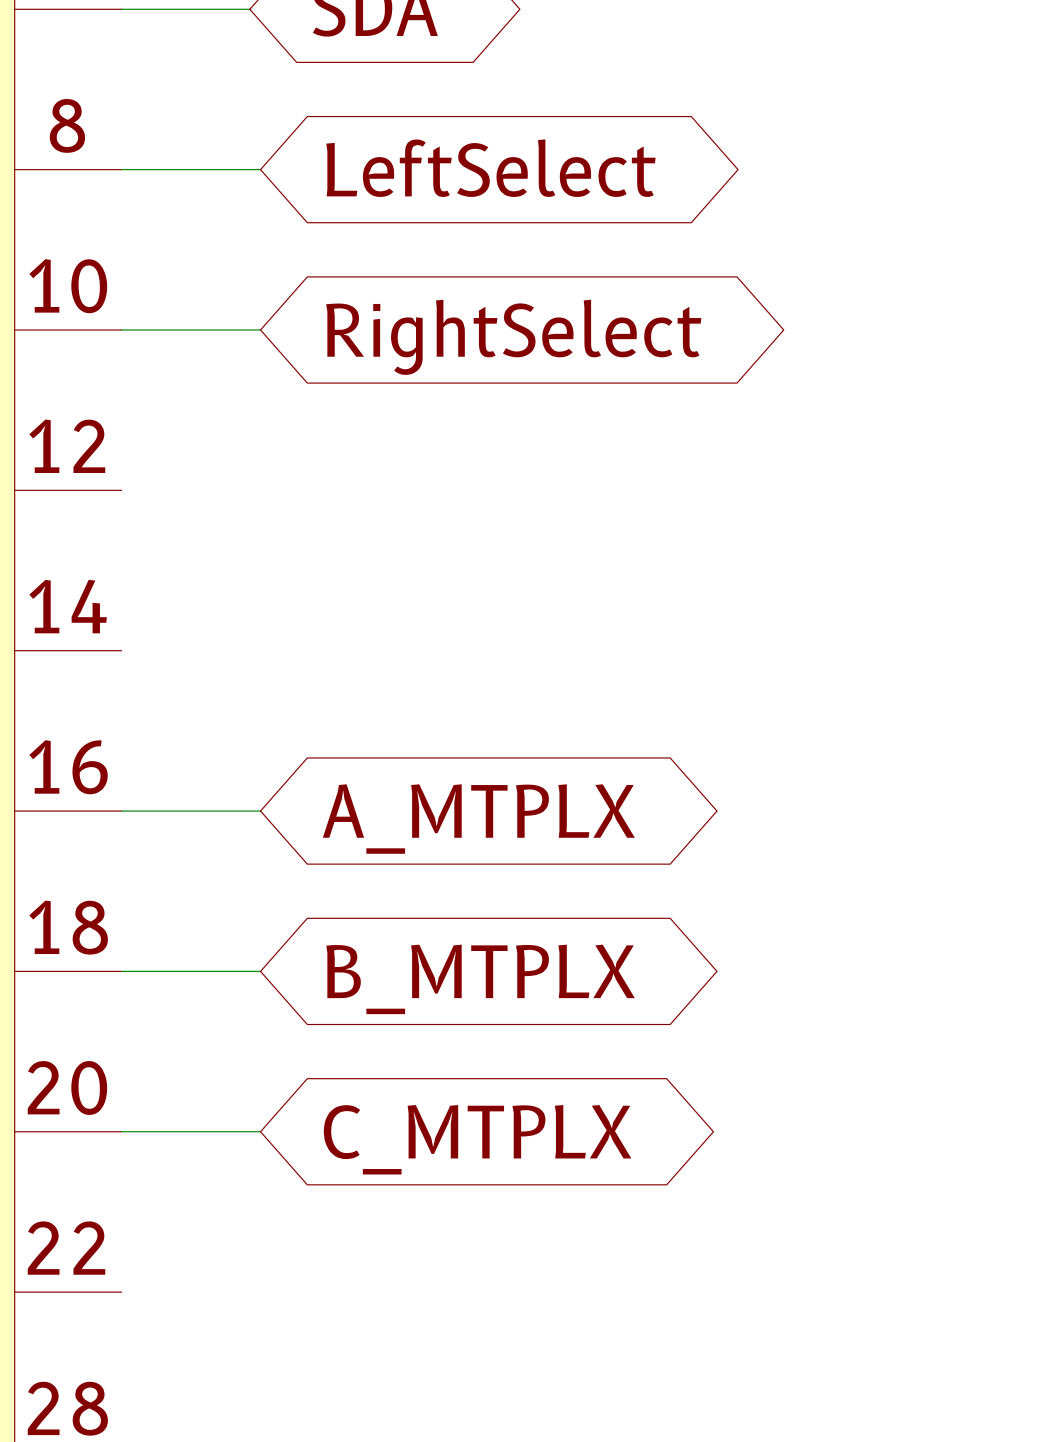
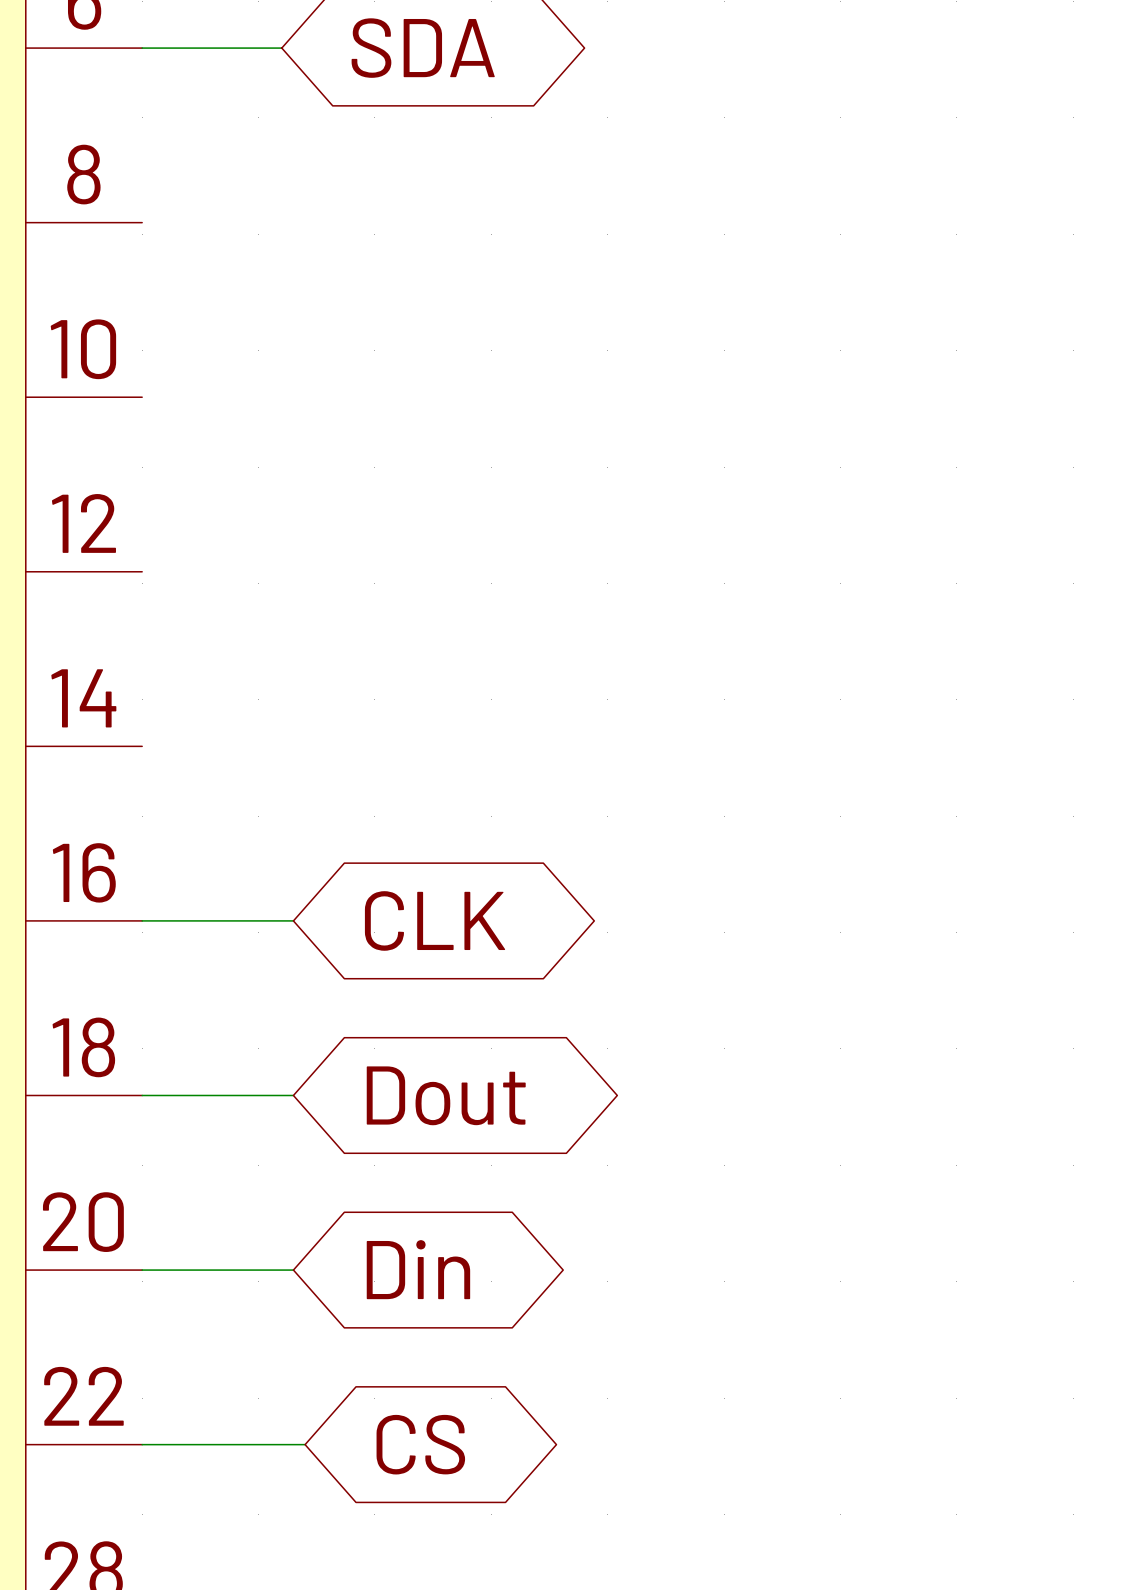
global label: LeftSelect (490, 168) -> none
wire: (121, 169) (260, 169) -> none
wire: (121, 329) (260, 329) -> none
global label: RightSelect (513, 337) -> none
global label: A_MTPLX (478, 819) -> CLK (435, 920)
global label: B_MTPLX (480, 979) -> Dout (446, 1095)
global label: C_MTPLX (477, 1139) -> Din (418, 1269)
wire: none -> (142, 1444) (305, 1444)
global label: none -> CS (420, 1444)

